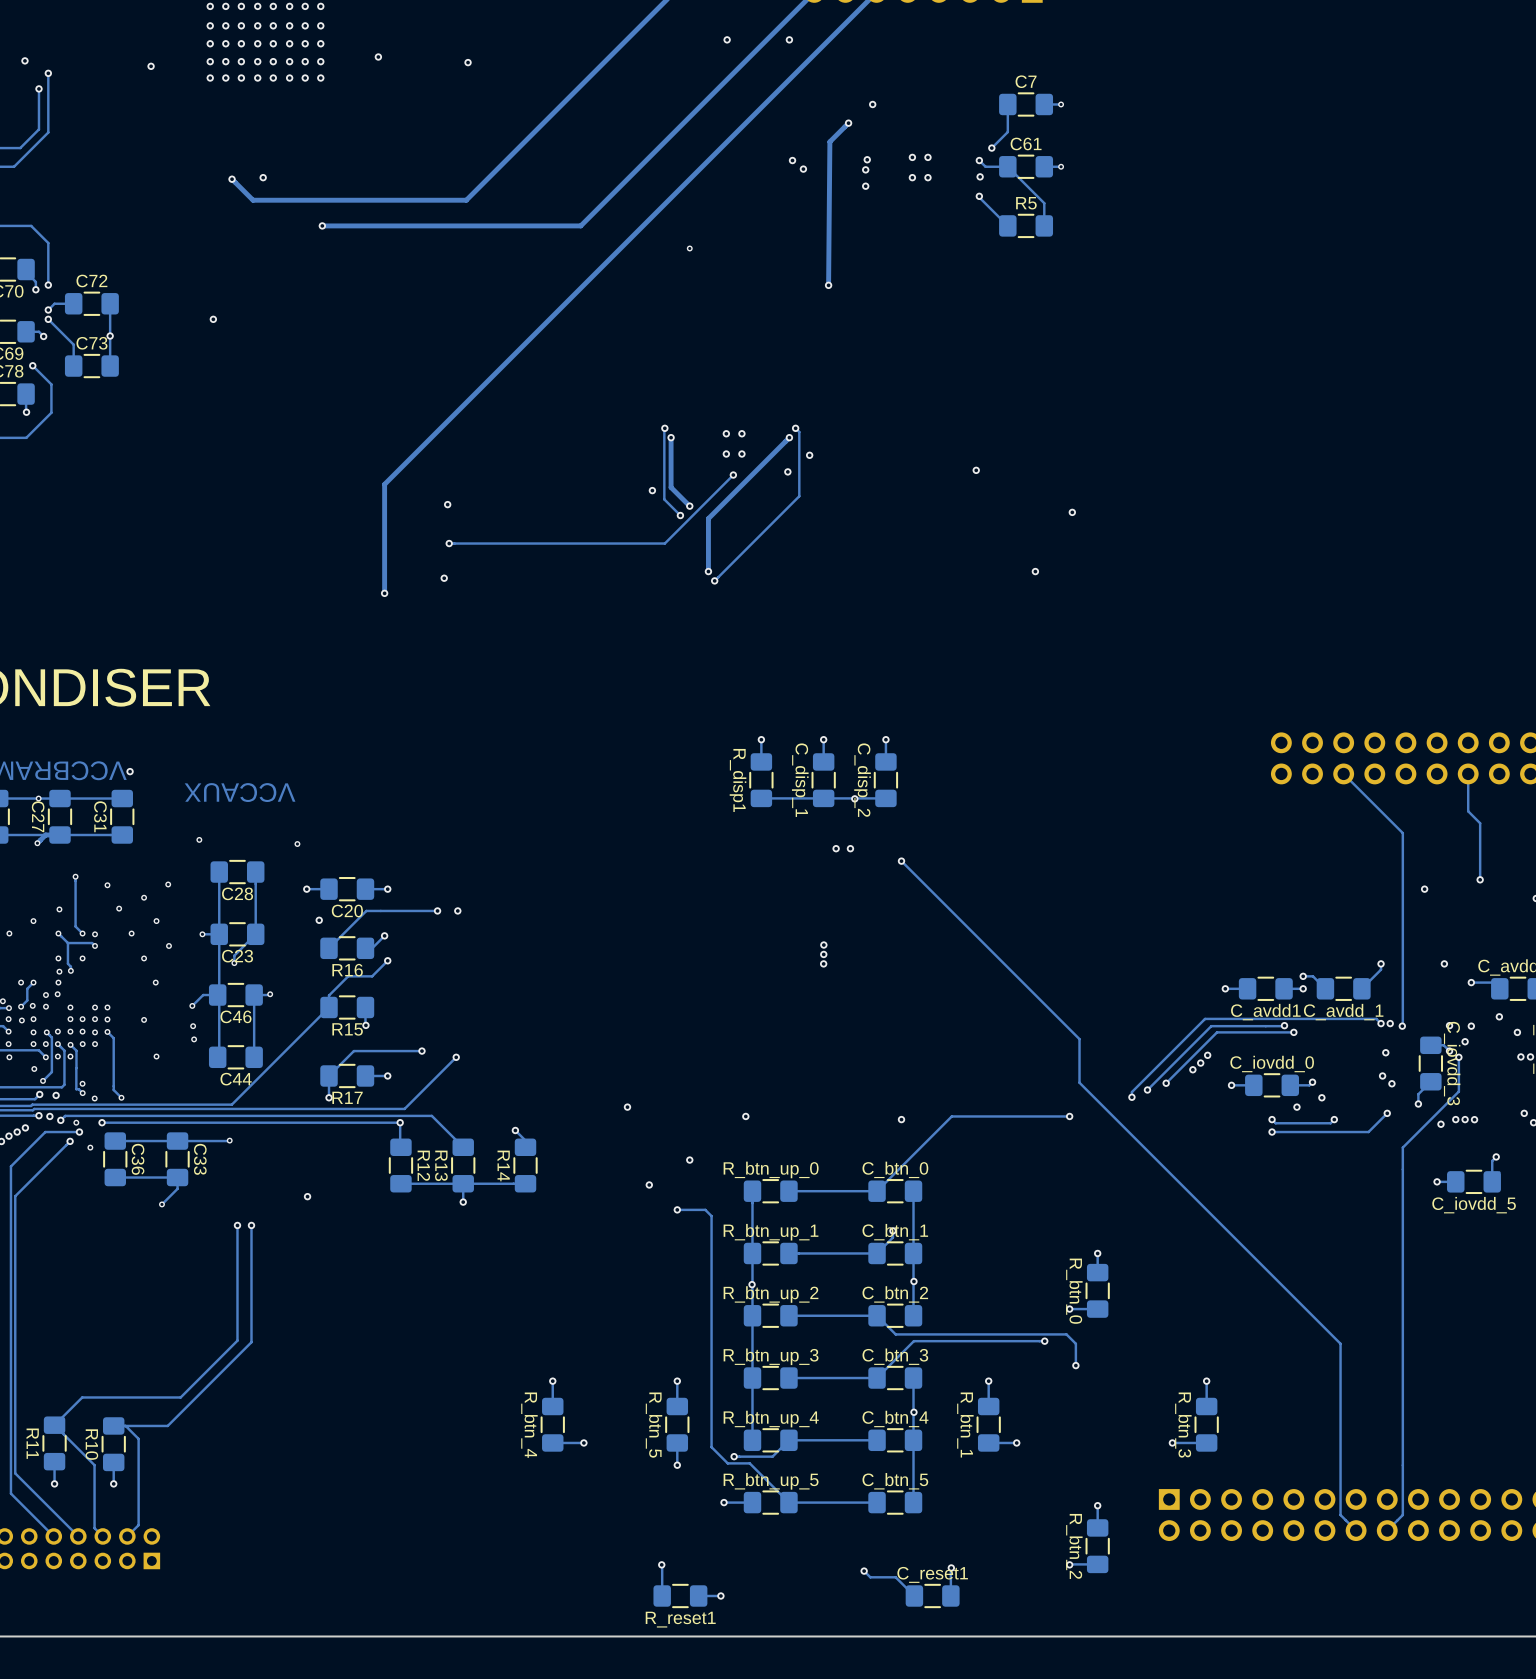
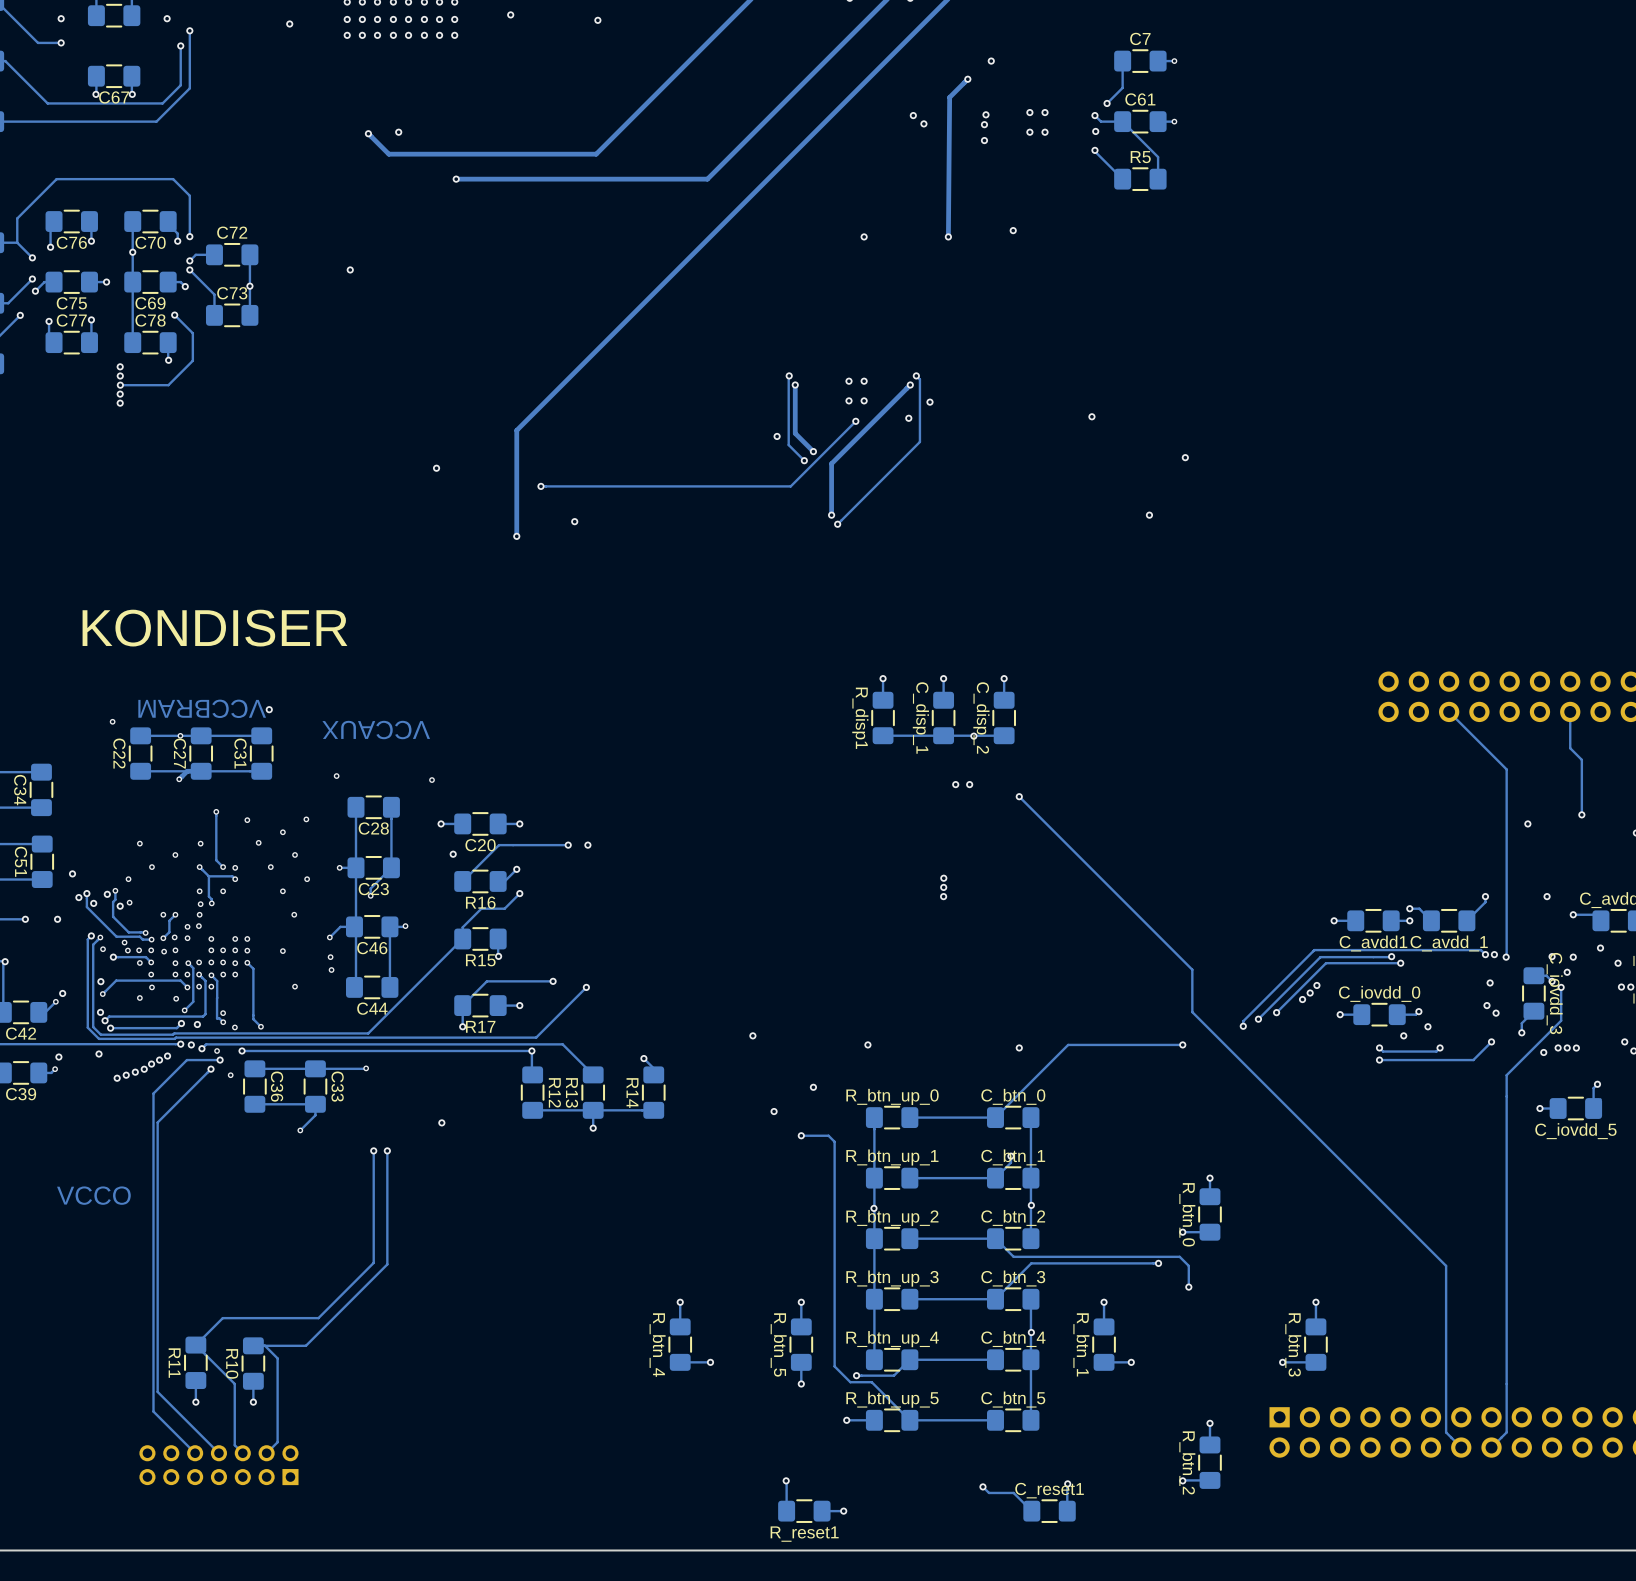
via: (689, 248) -> none
via: none -> (1013, 230)
via: none -> (864, 236)
via: (447, 504) -> none
via: none -> (436, 468)
via: none -> (540, 486)
track: (666, 541) (664, 543) (449, 543) -> (790, 486) (540, 486)
via: (449, 543) -> none

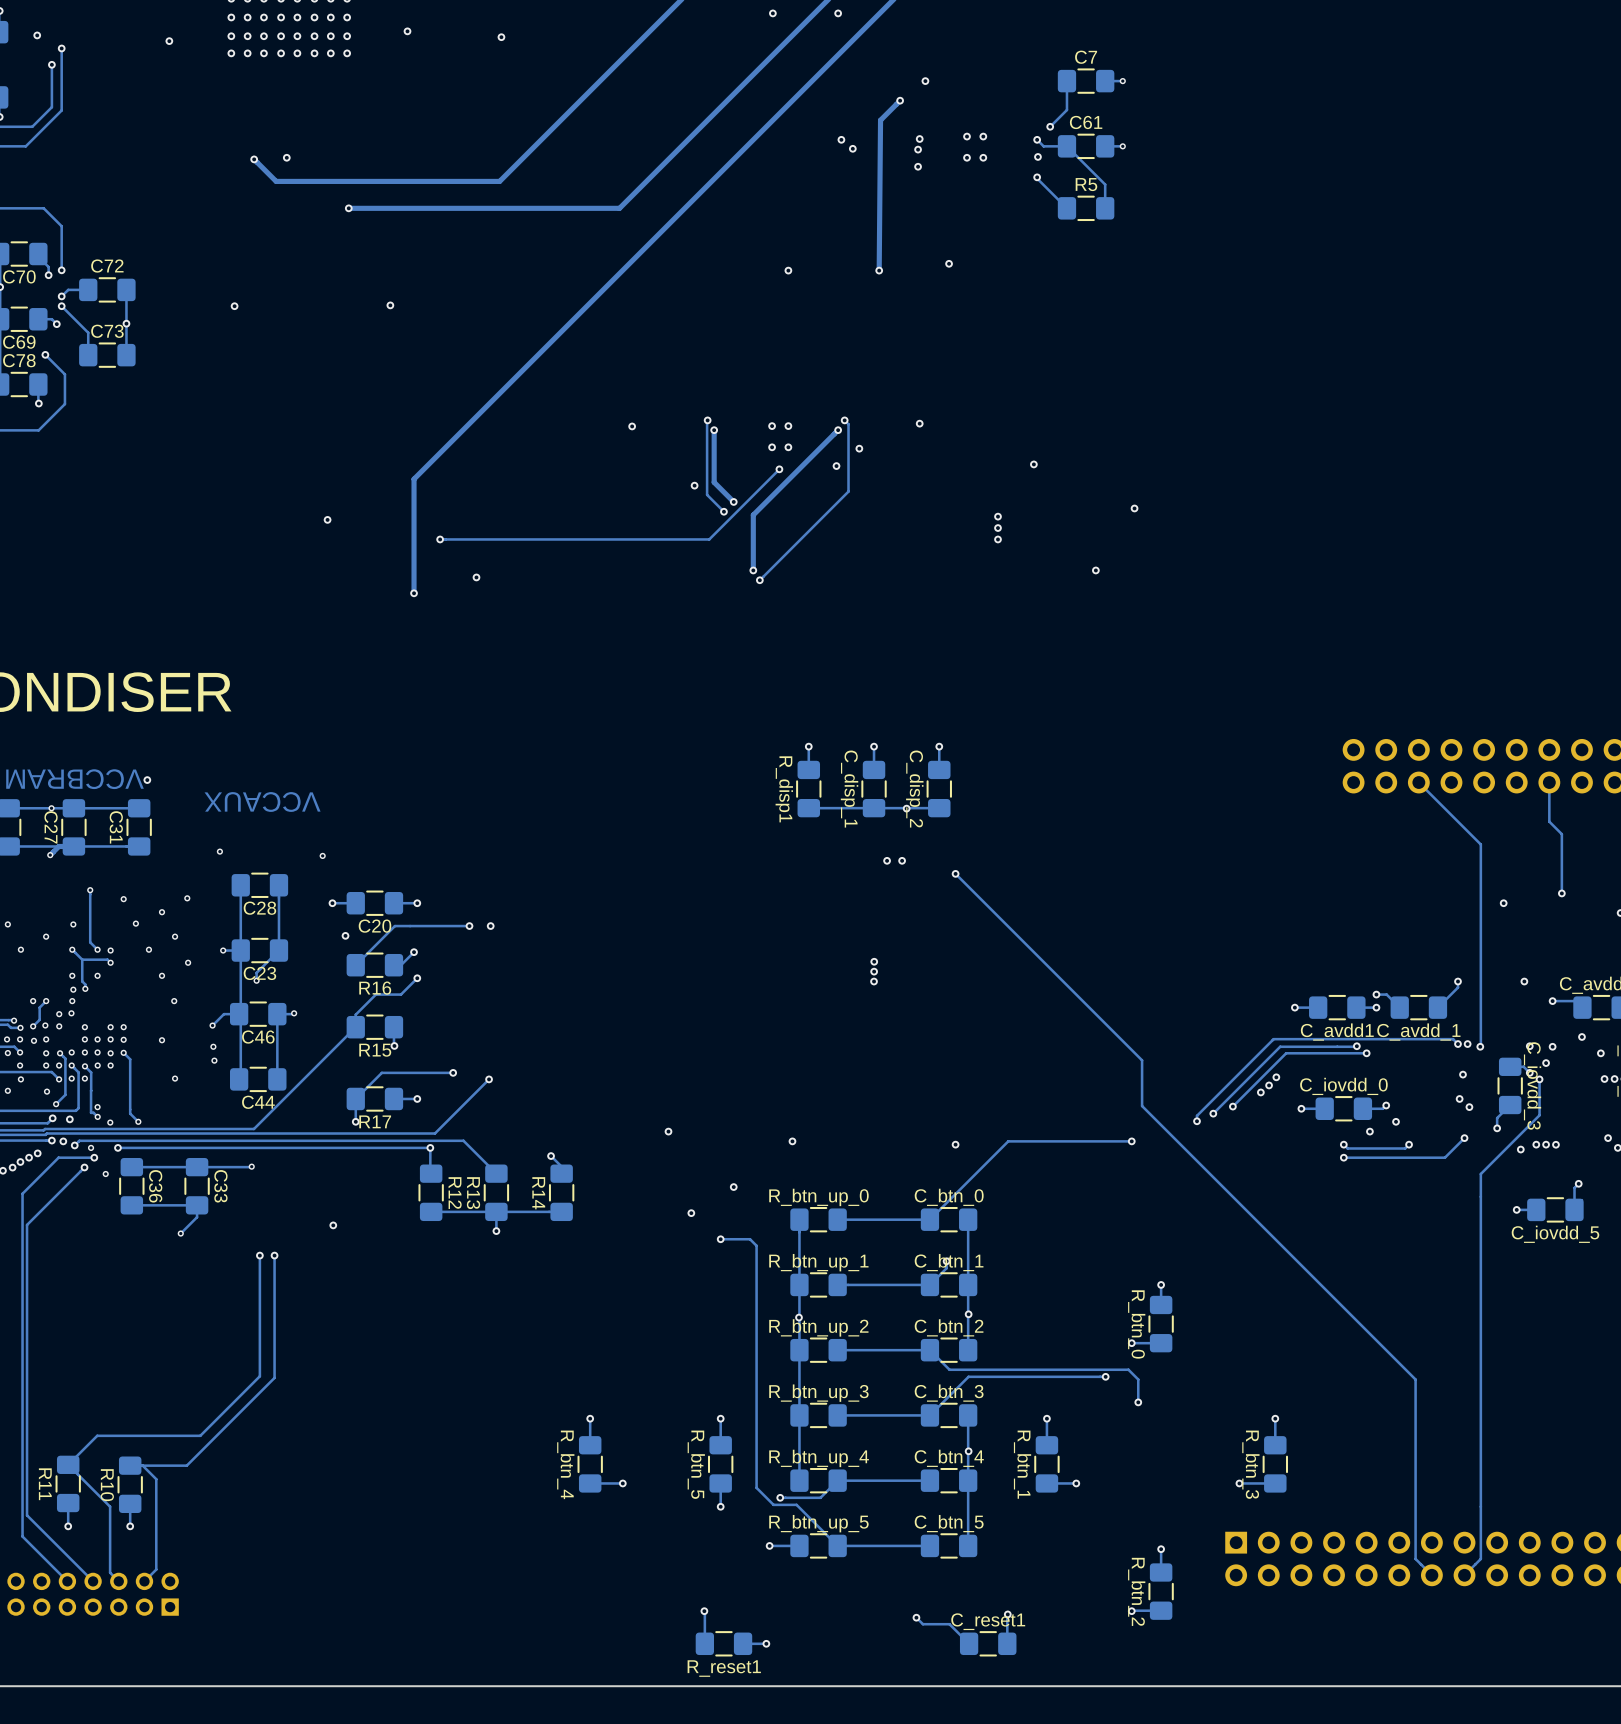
via: none -> (390, 305)
via: none -> (919, 423)
via: none -> (632, 426)
via: none -> (998, 516)
via: none -> (998, 528)
via: none -> (998, 539)

